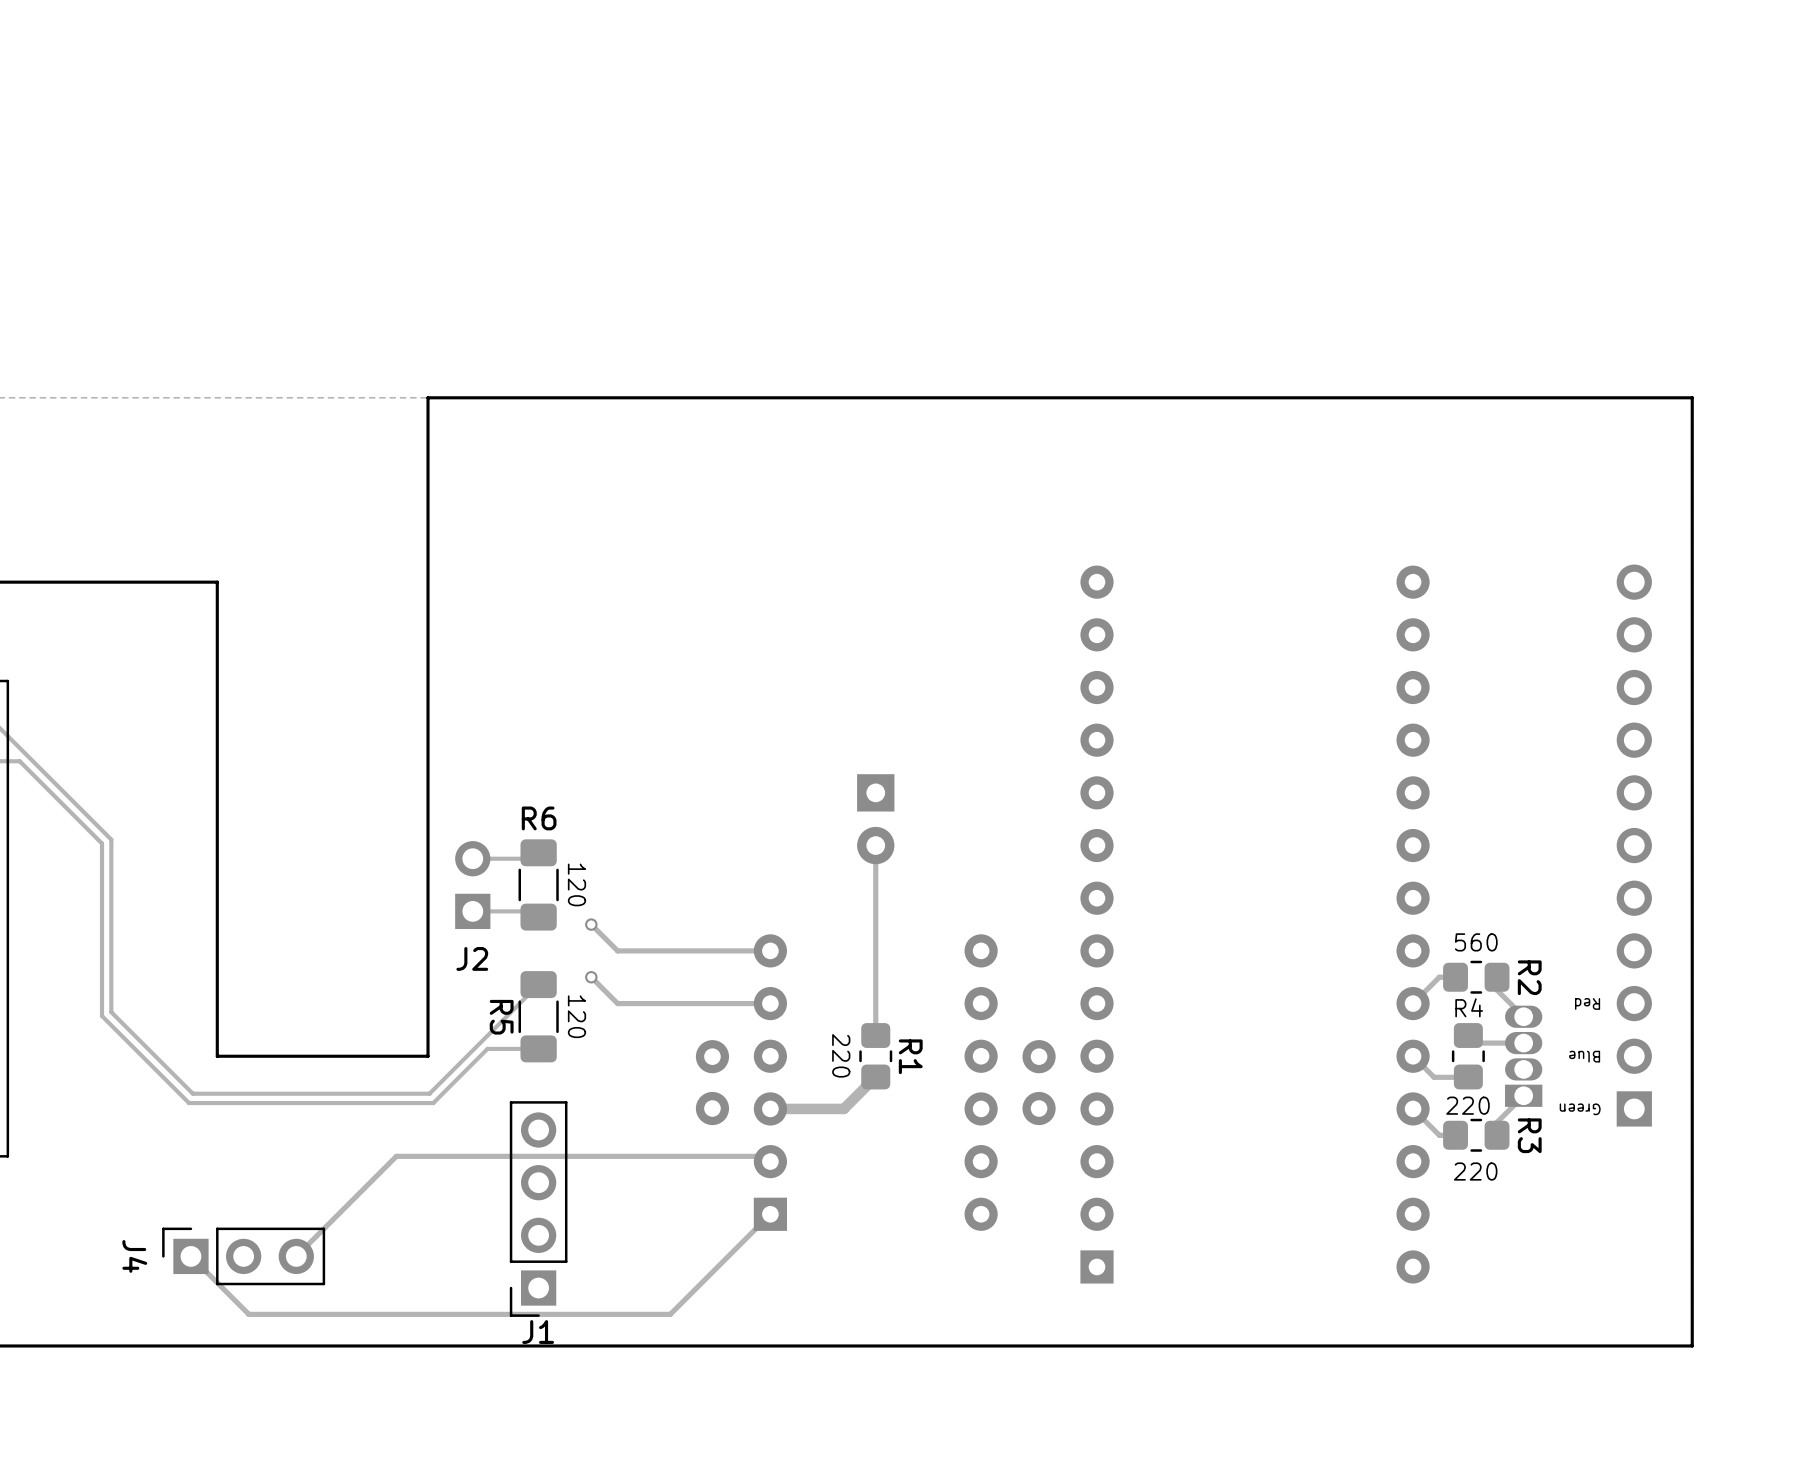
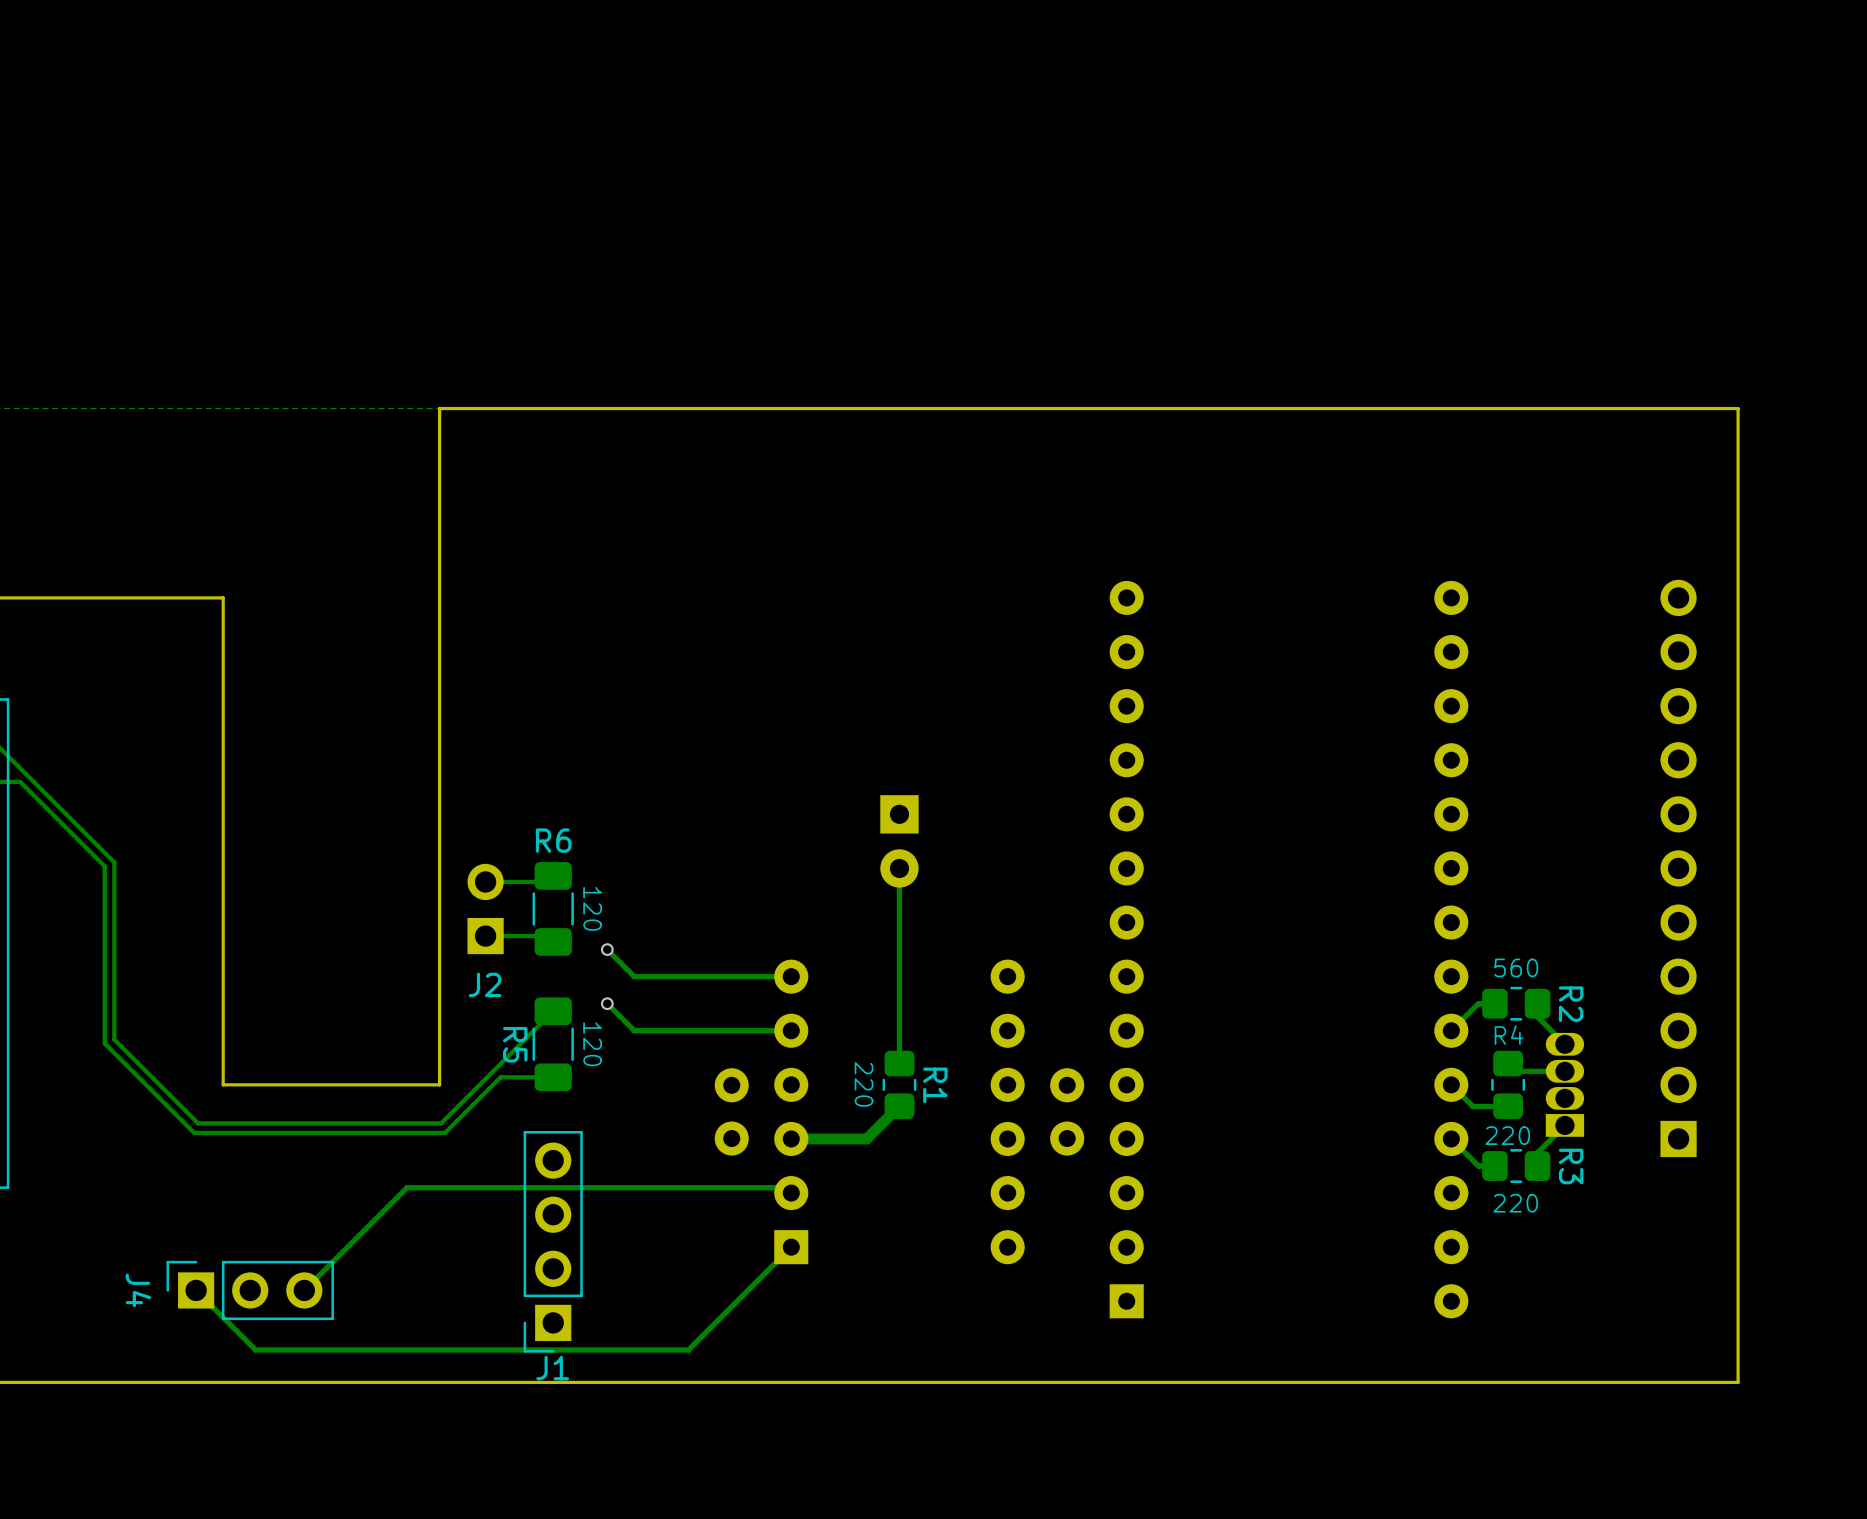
text: Red (1587, 1003) -> none
text: Blue (1584, 1056) -> none
text: Green (1580, 1109) -> none

